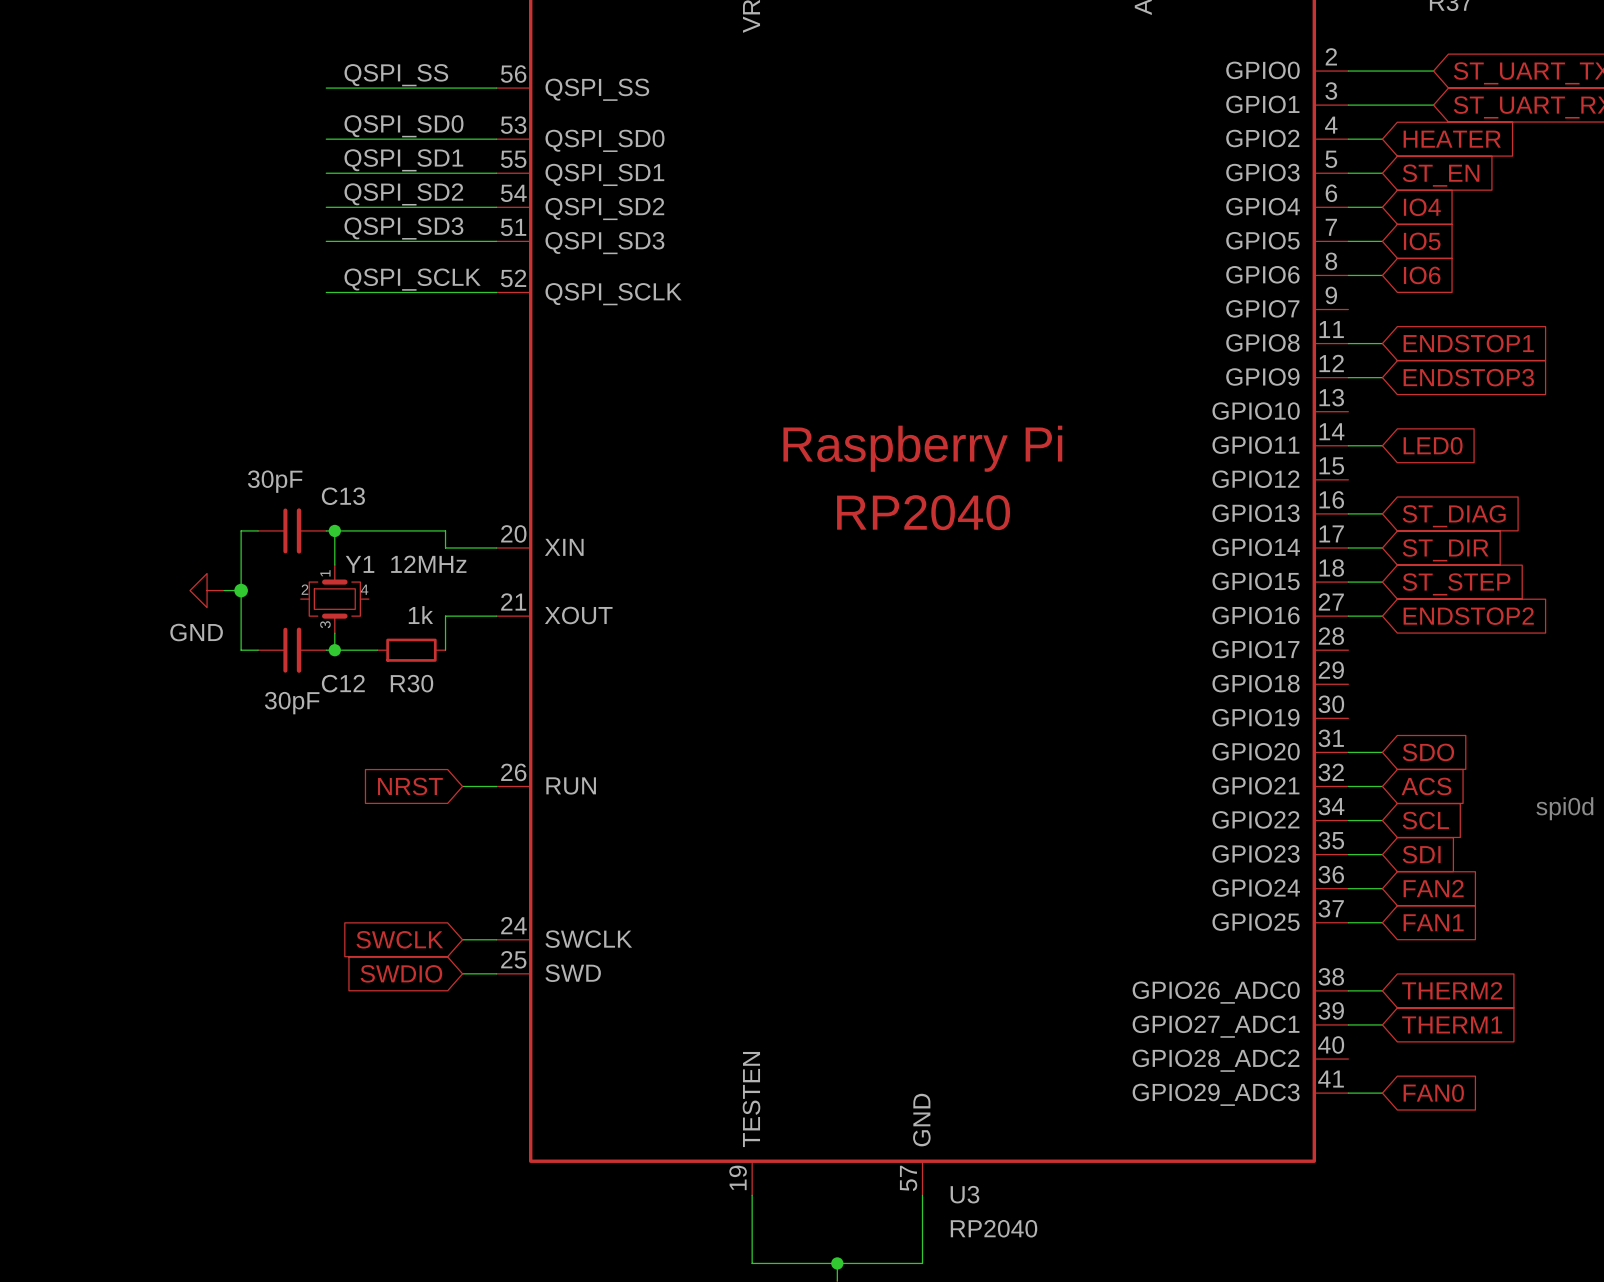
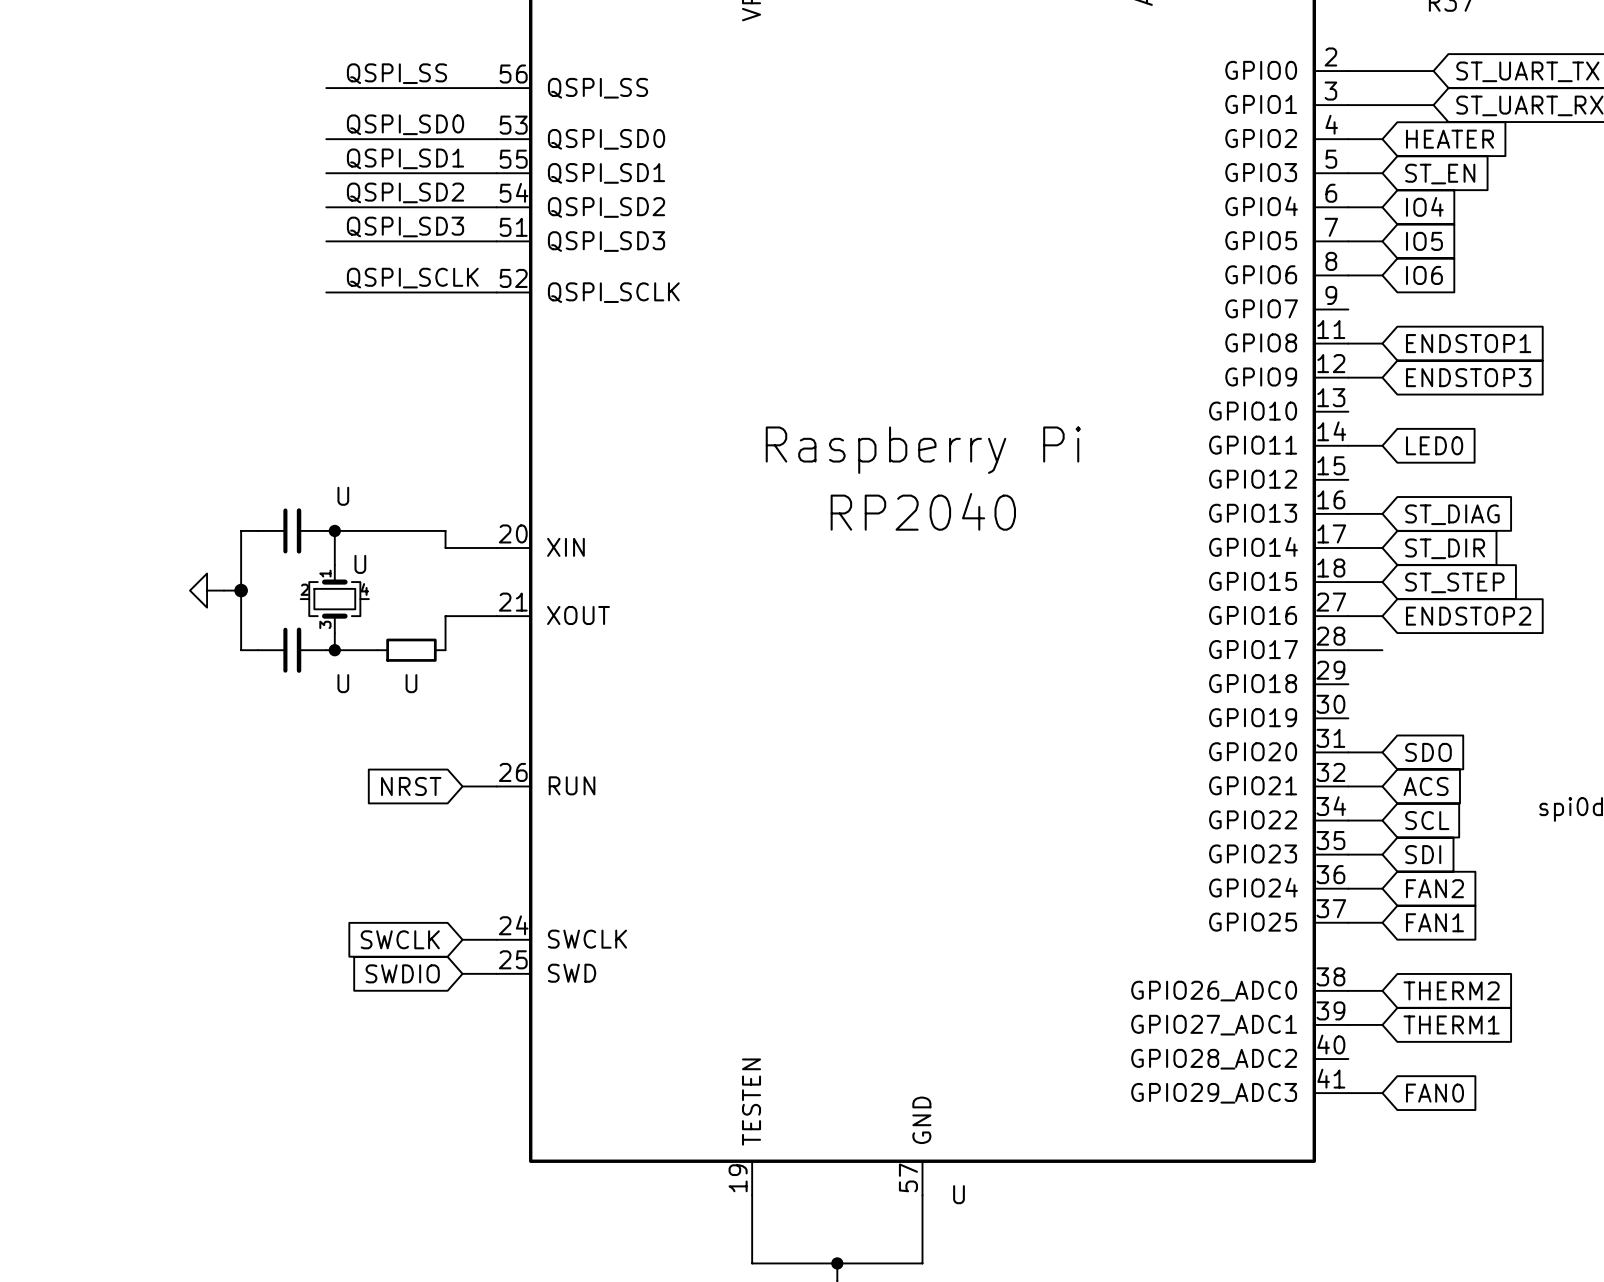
C13 value: 30pF (275, 481) -> none
C13 name: C13 (343, 496) -> U (343, 496)
Y1 name: Y1 (360, 564) -> U (360, 564)
Y1 value: 12MHz (428, 564) -> none
R30 value: 1k (420, 615) -> none
power symbol text: GND (196, 632) -> none
wire: none -> (1348, 650) (1382, 650)
C12 name: C12 (343, 683) -> U (343, 683)
R30 name: R30 (411, 683) -> U (411, 683)
C12 value: 30pF (292, 703) -> none
U3 name: U3 (964, 1194) -> U (959, 1194)
U3 value: RP2040 (994, 1228) -> none

